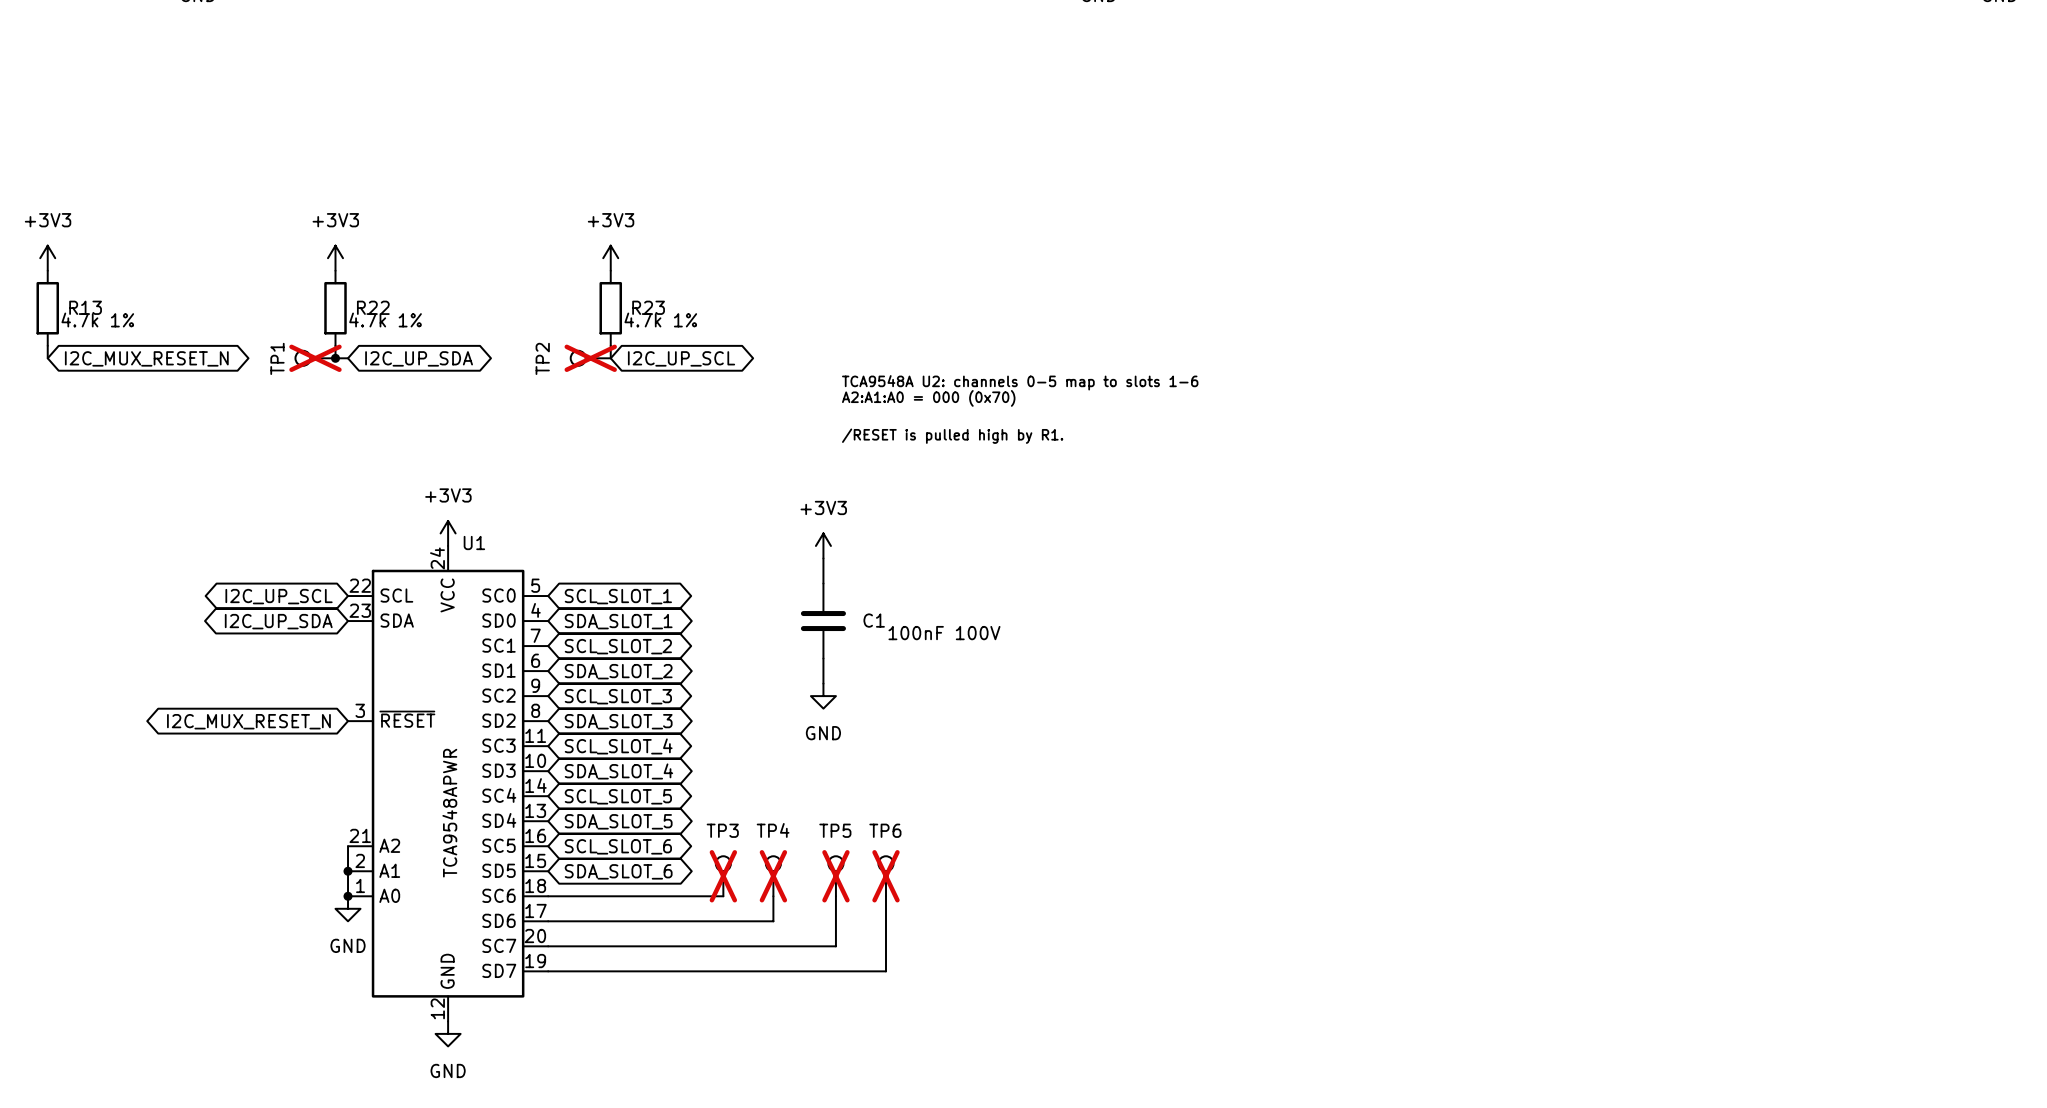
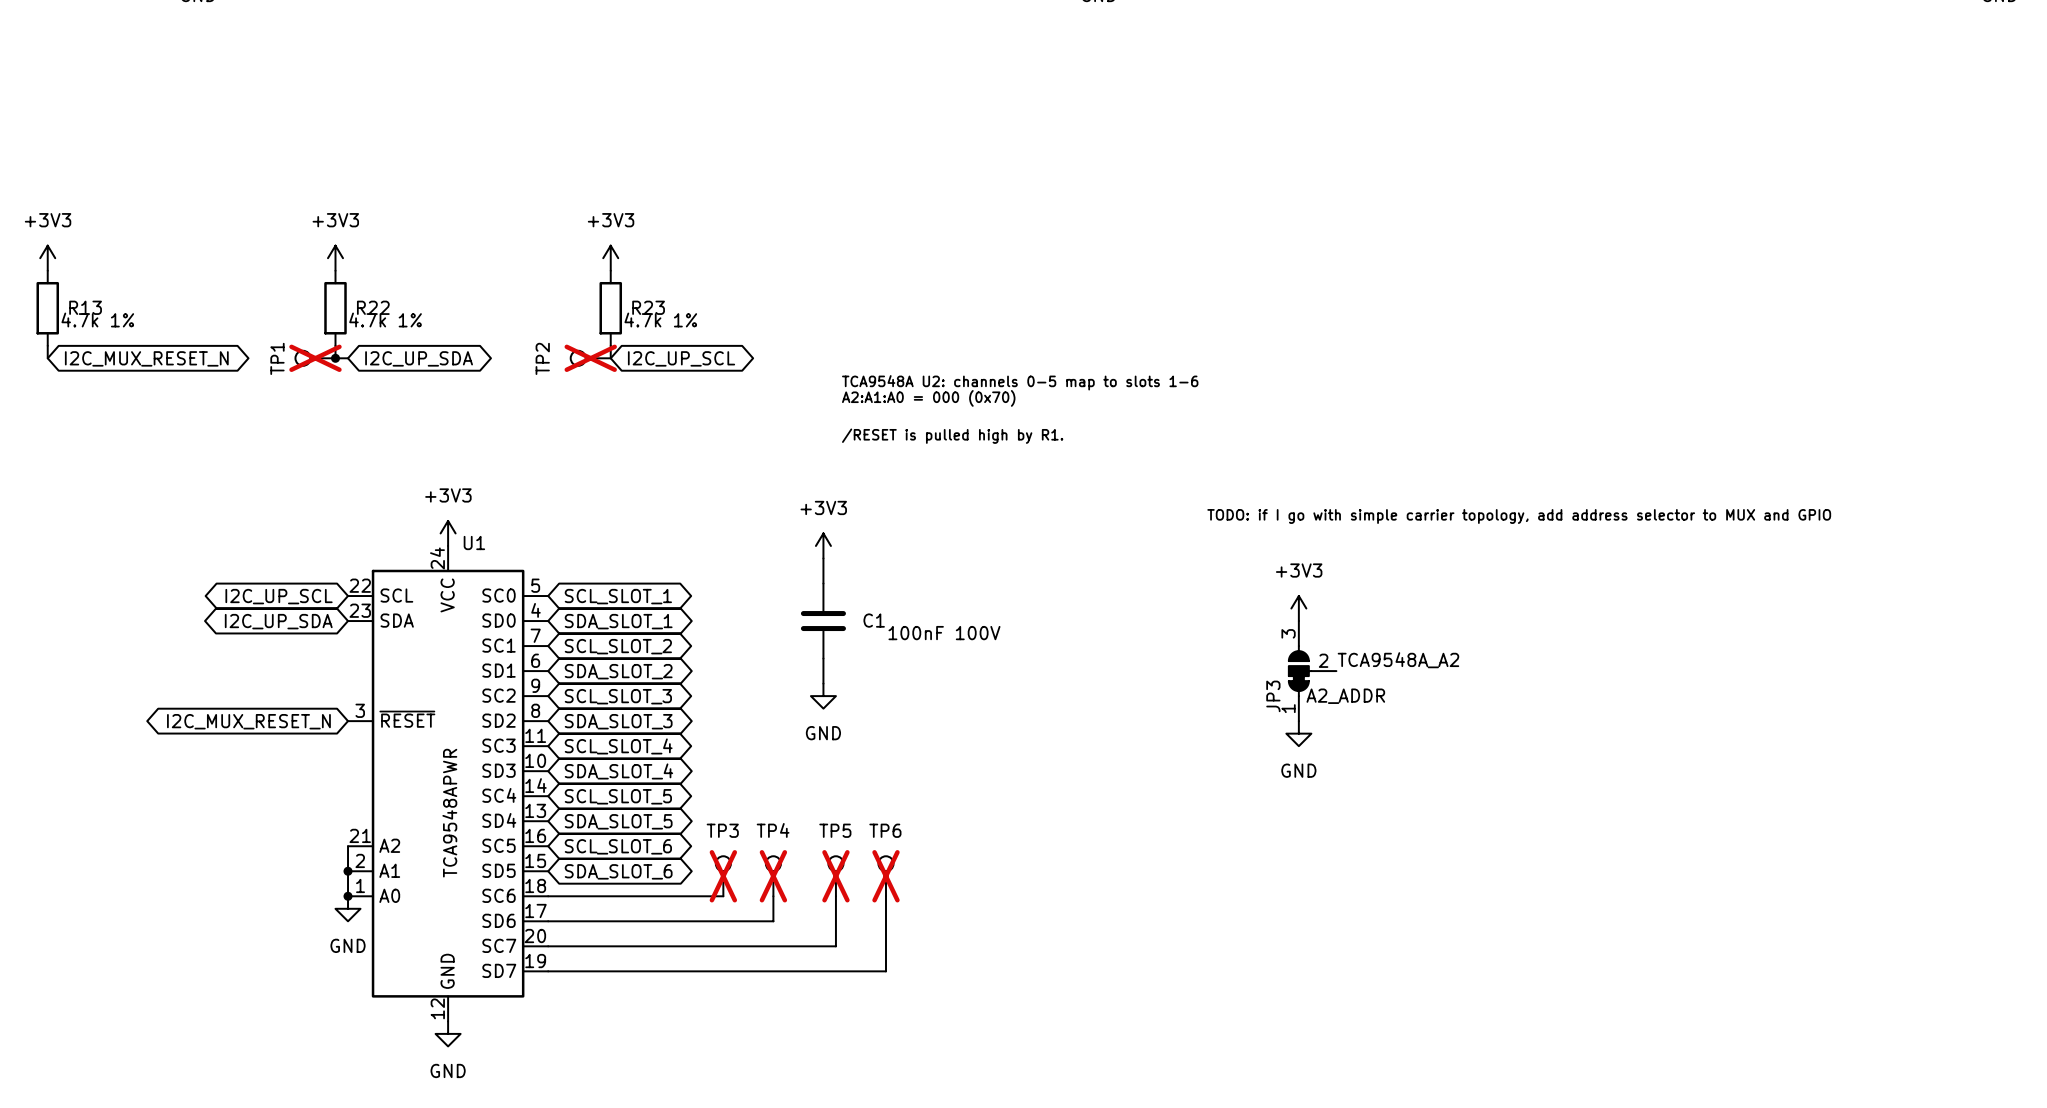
text: none -> TODO: if I go with simple carrier topology, add address selector to MUX and GPIO (1519, 516)
power symbol: none -> +3V3 (1298, 608)
label: none -> TCA9548A_A2 (1398, 660)
JP3: none -> A2_ADDR (1312, 671)
power symbol: none -> GND (1298, 733)

